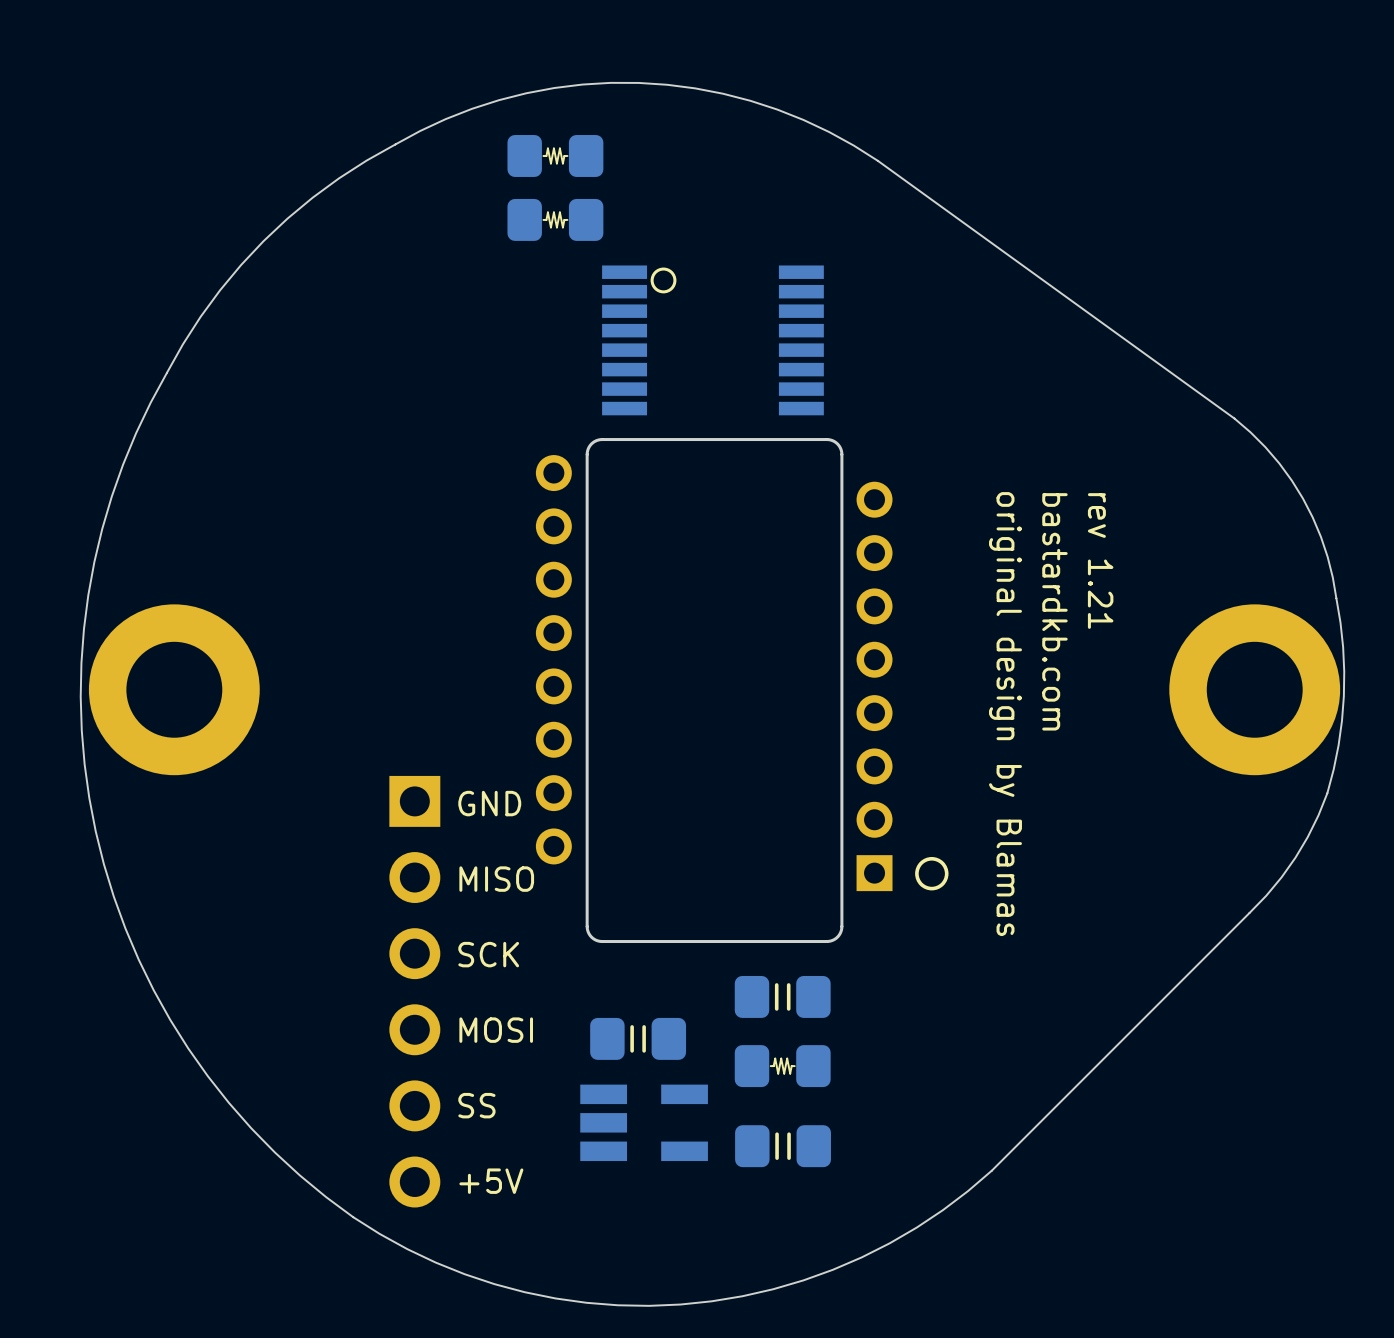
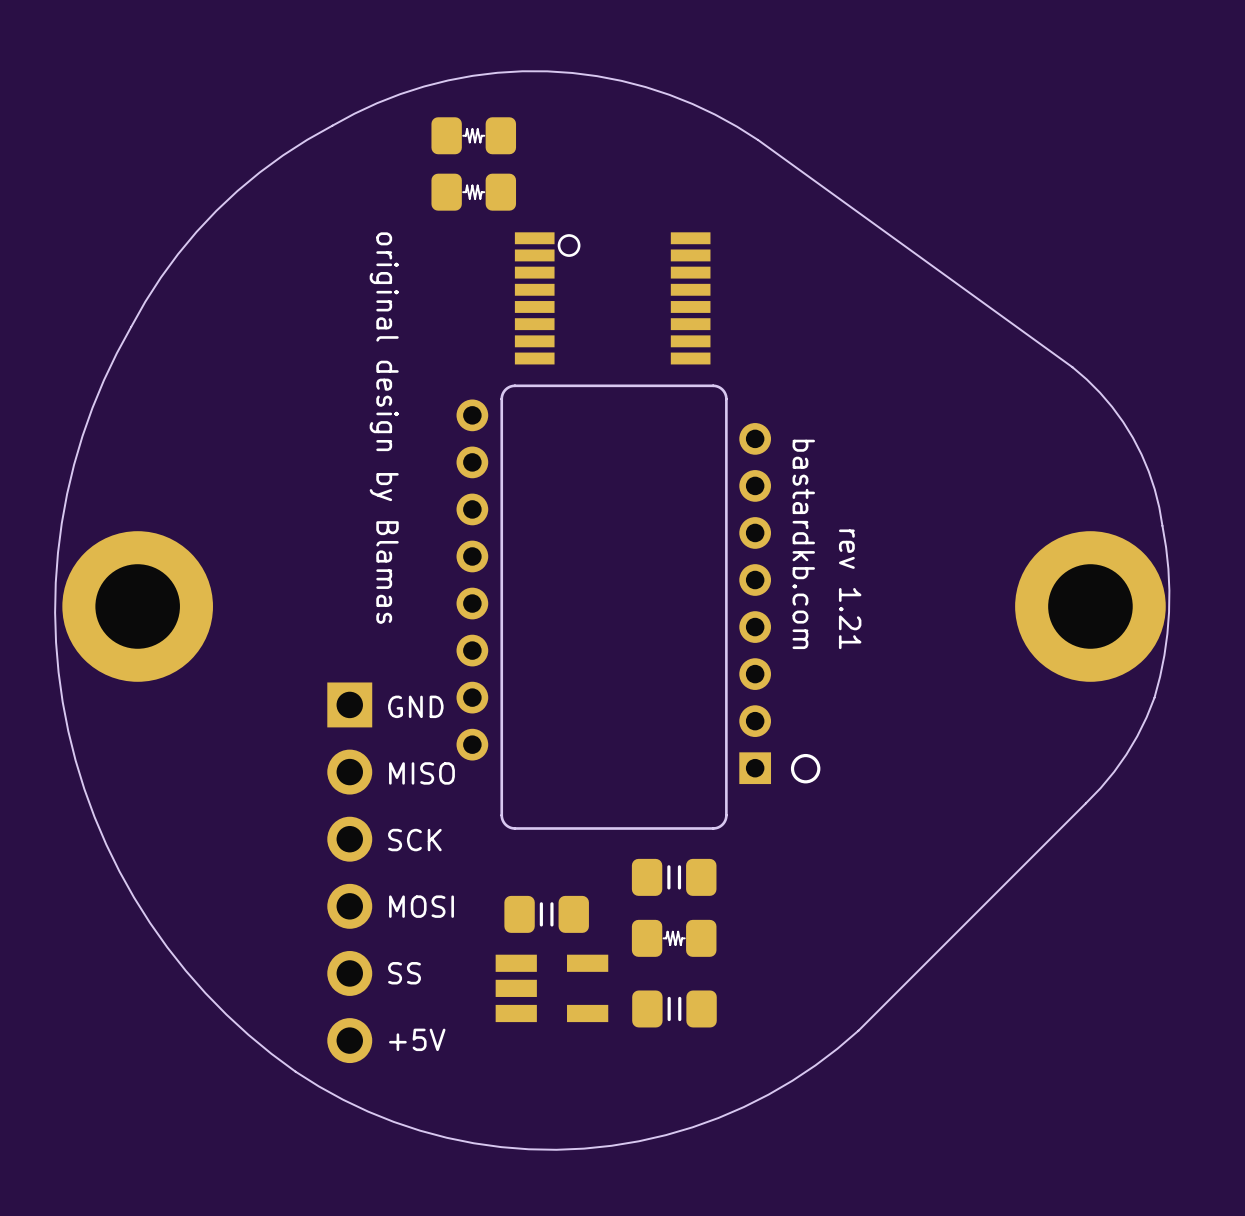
text position: rev 1.21 (1100, 561) -> rev 1.21 (850, 589)
text position: bastardkb.com (1054, 611) -> bastardkb.com (803, 544)
text position: original design by Blamas (1005, 714) -> original design by Blamas (384, 428)

